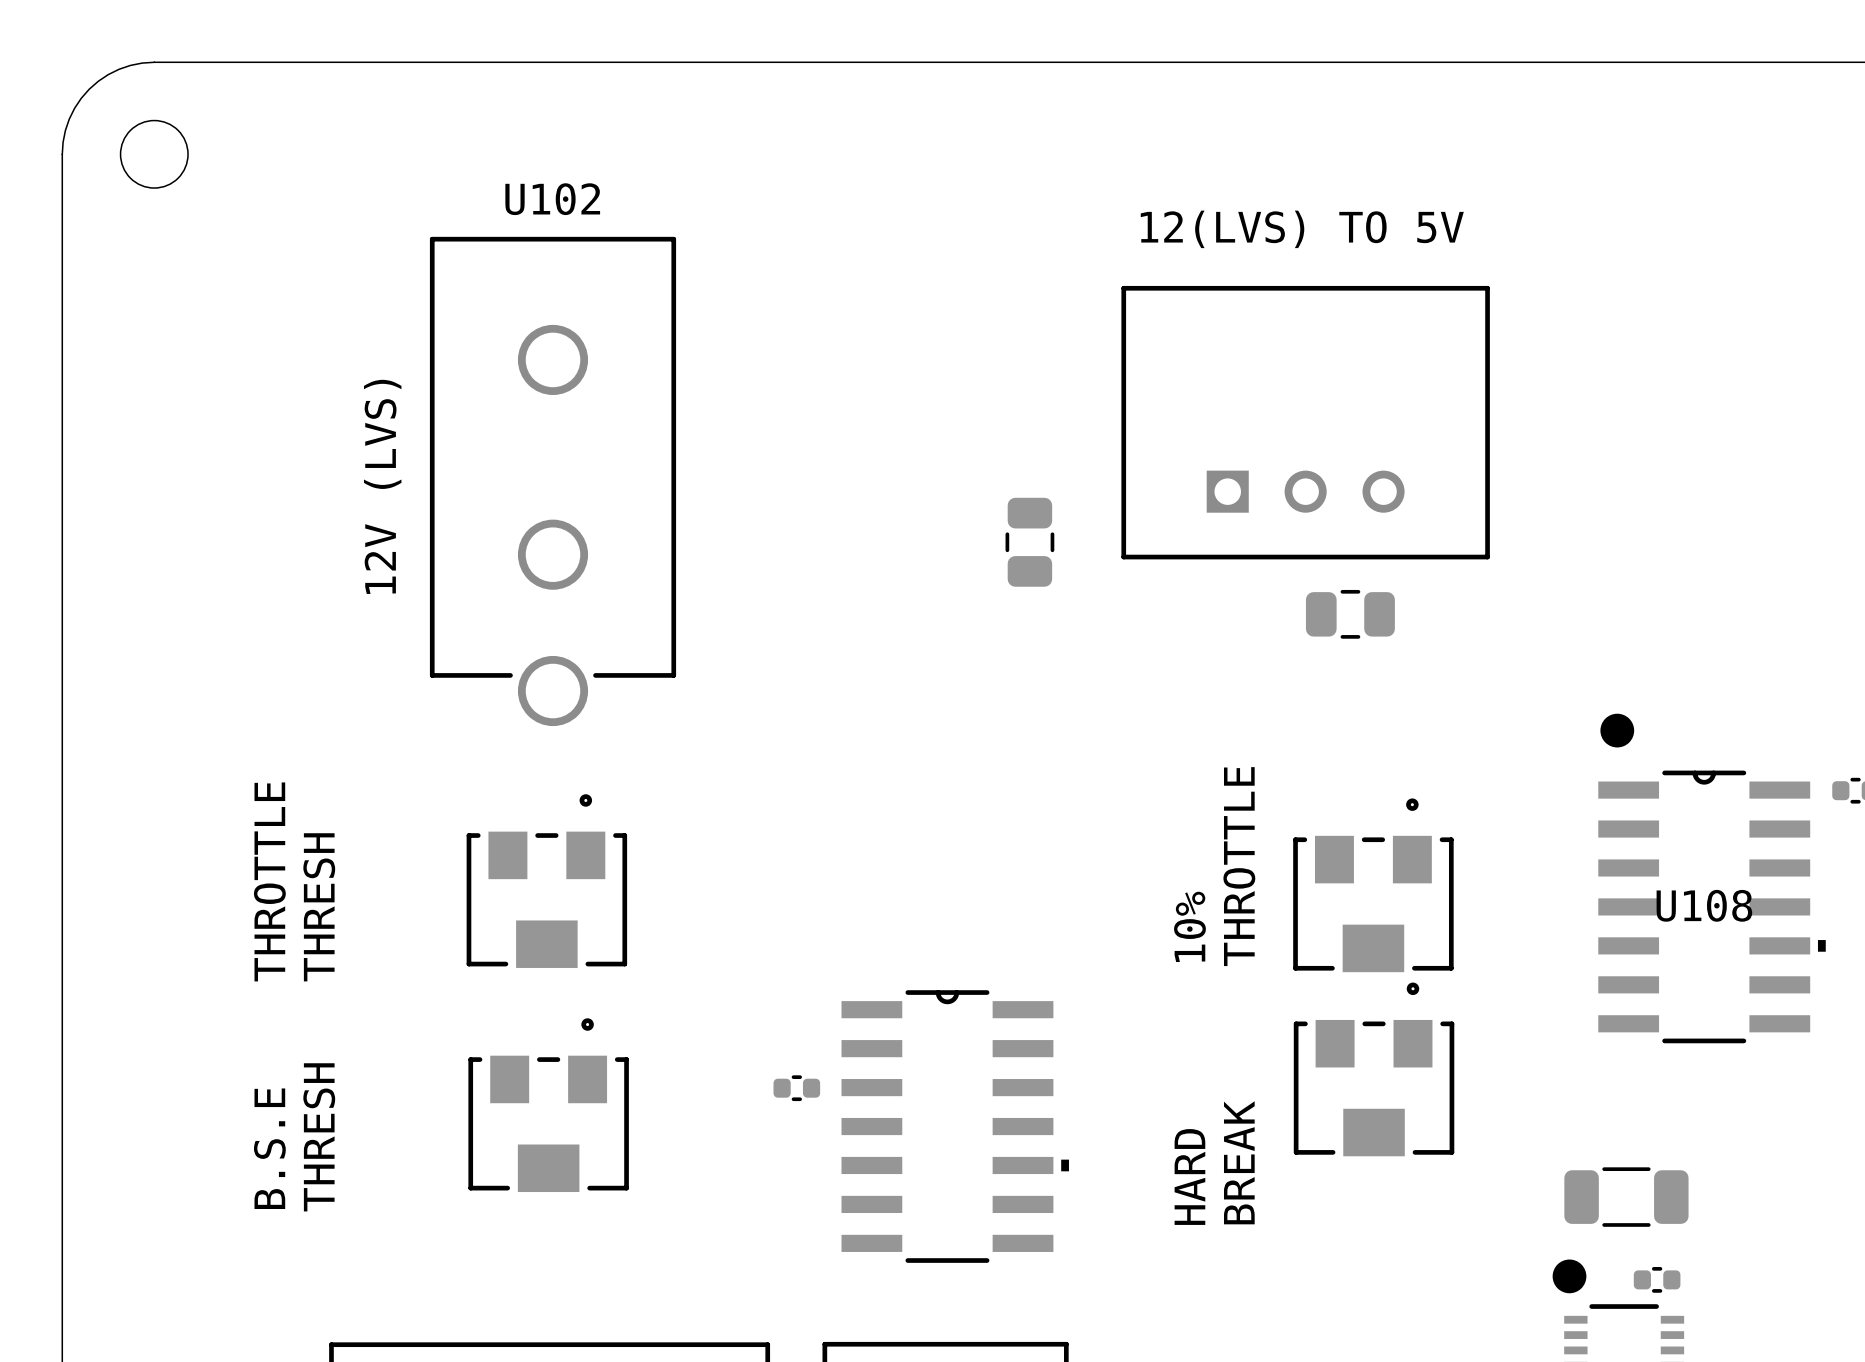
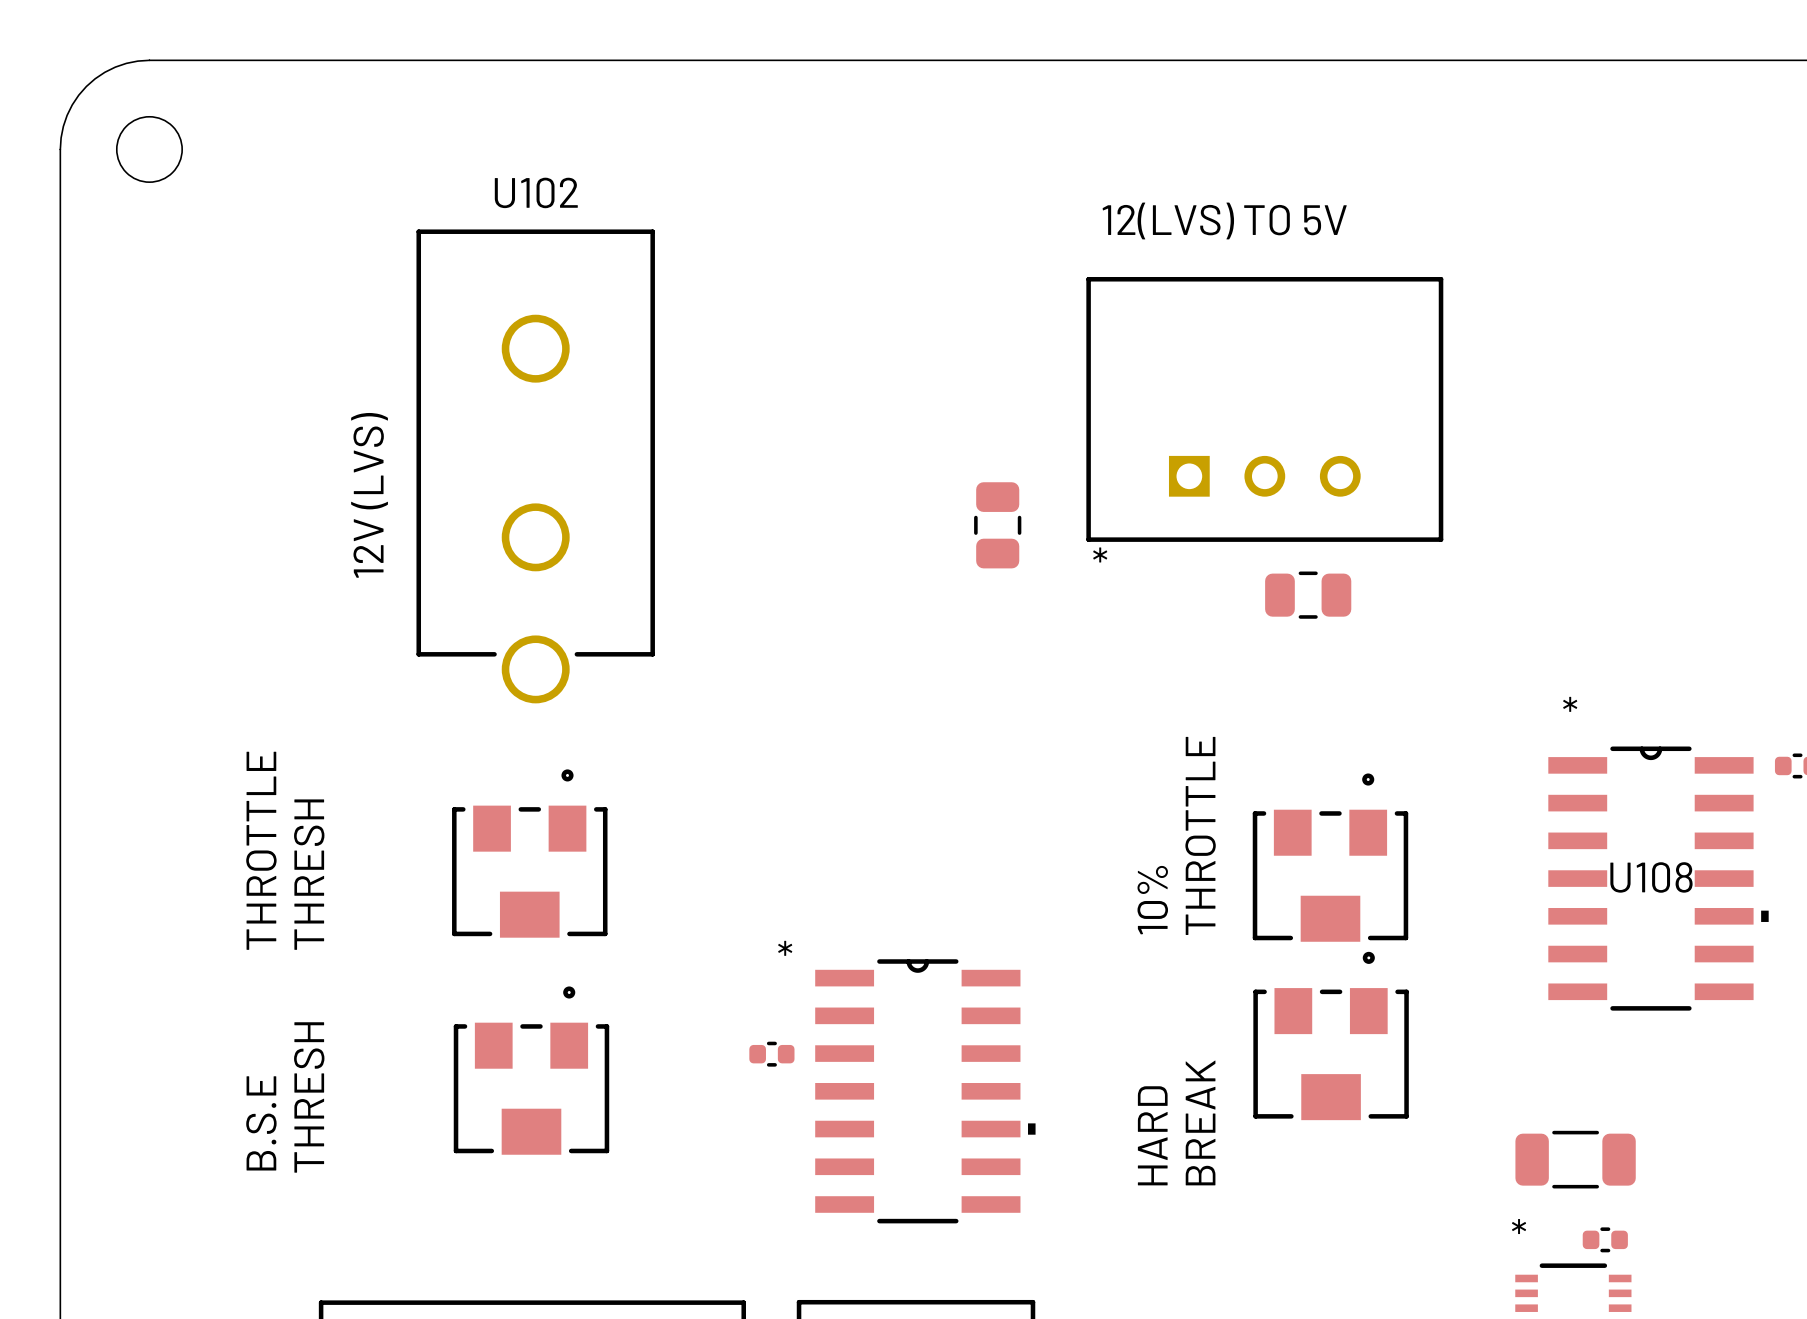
part text: none -> * (1100, 554)
drawing: [1600, 713, 1635, 748] -> none
U108 text: none -> * (1570, 704)
part text: none -> * (785, 948)
drawing: [1552, 1259, 1587, 1294] -> none
part text: none -> * (1519, 1226)

